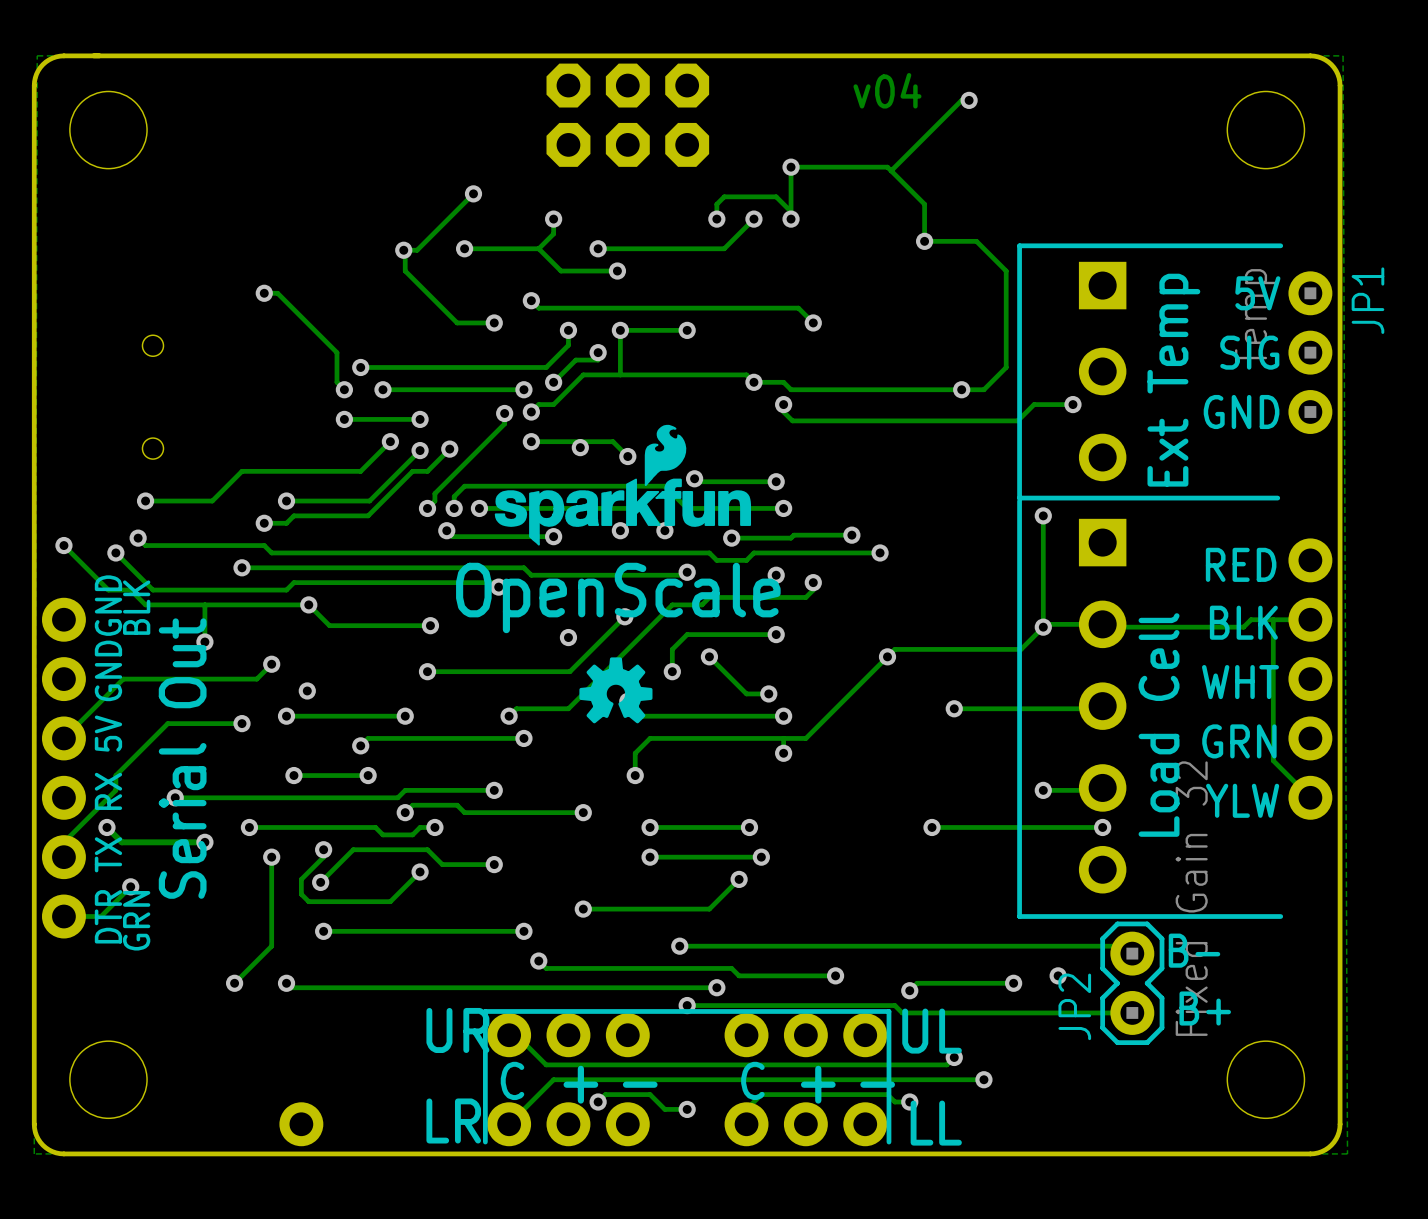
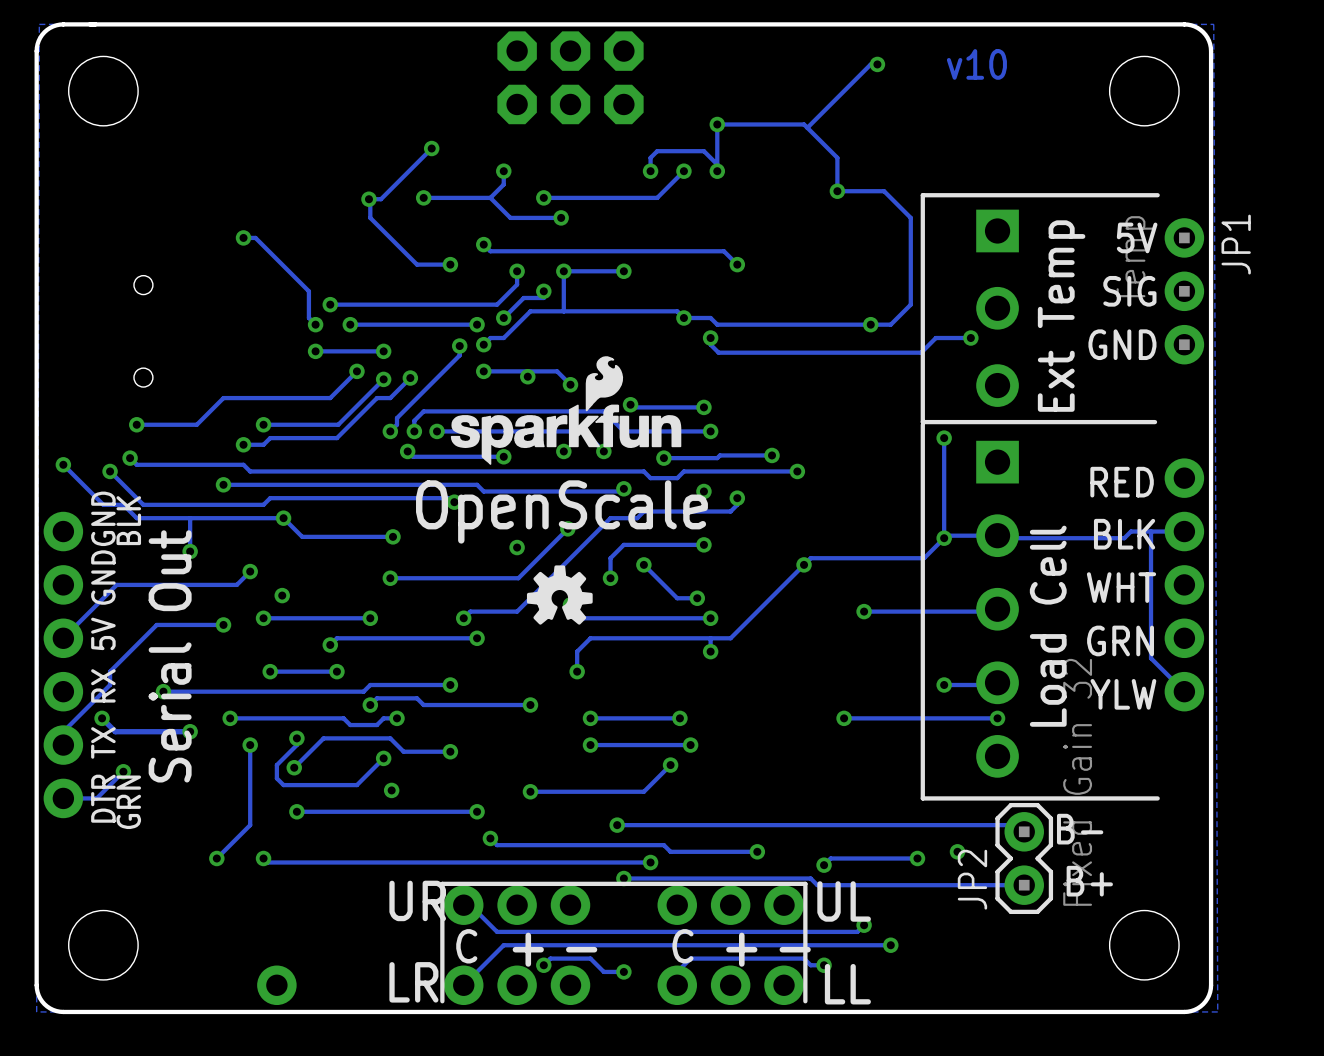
text: v04 (887, 90) -> none
text: none -> v10 (976, 64)
via: none -> (391, 790)

